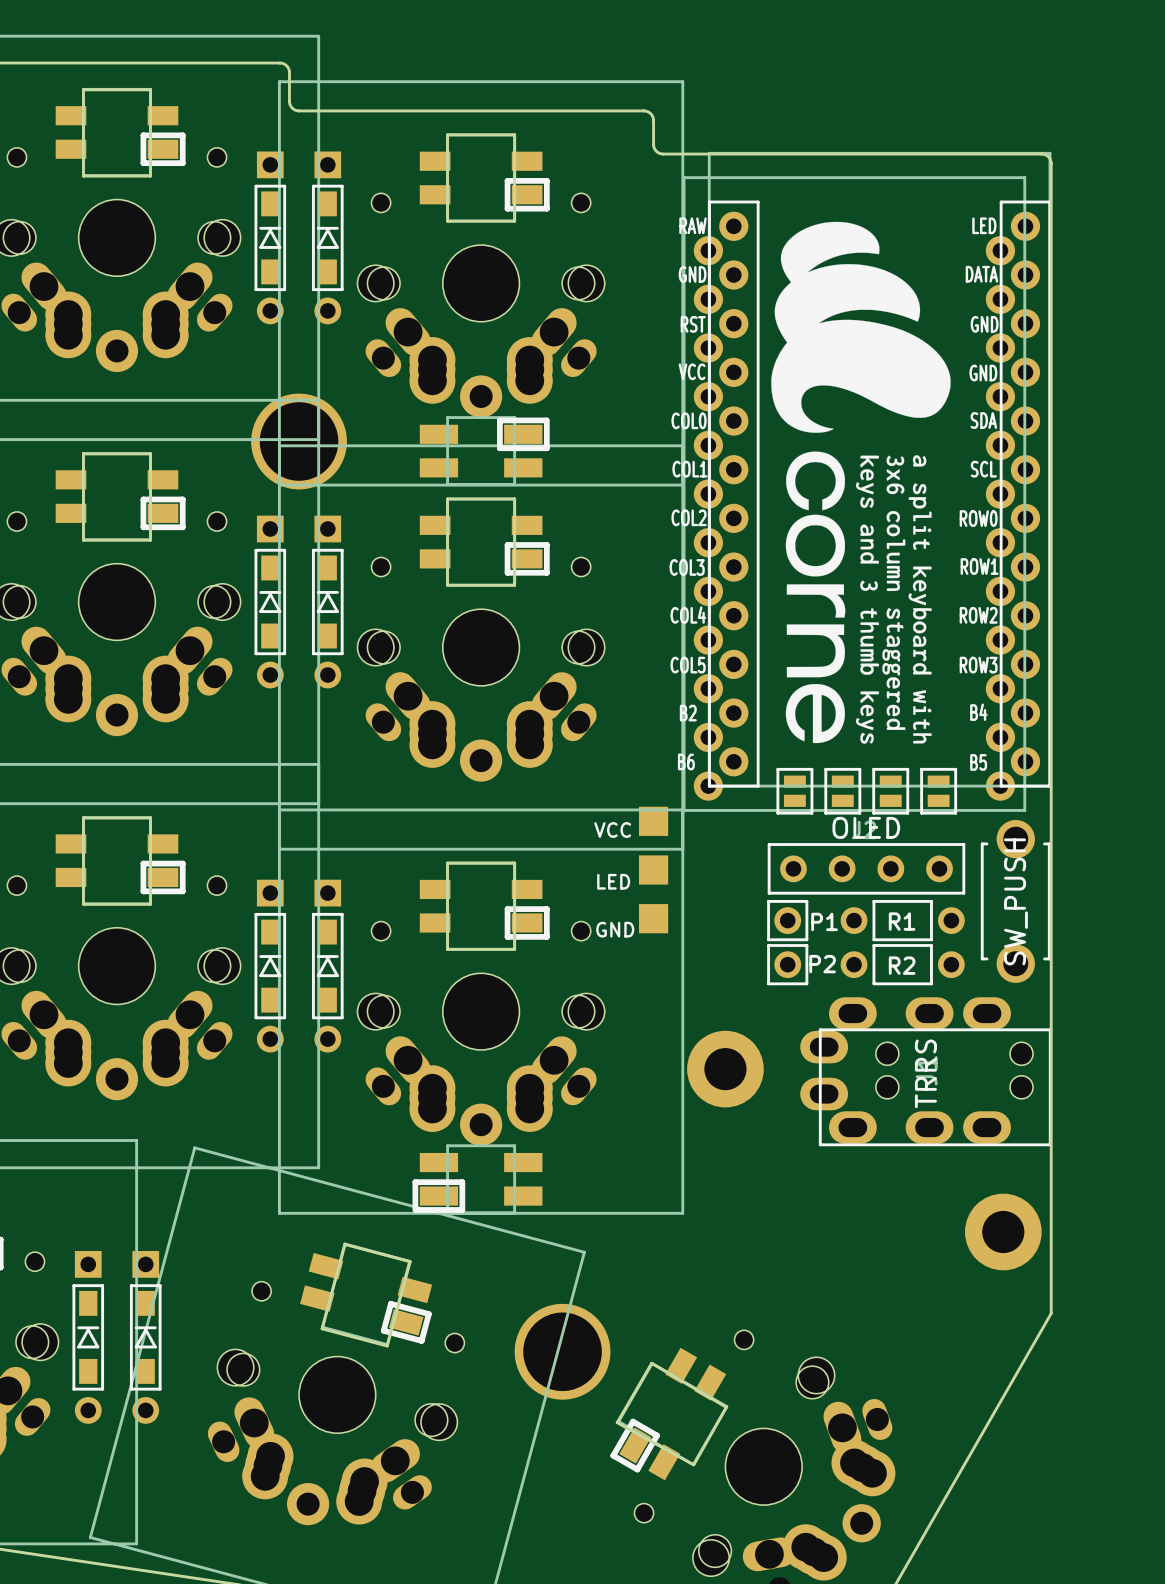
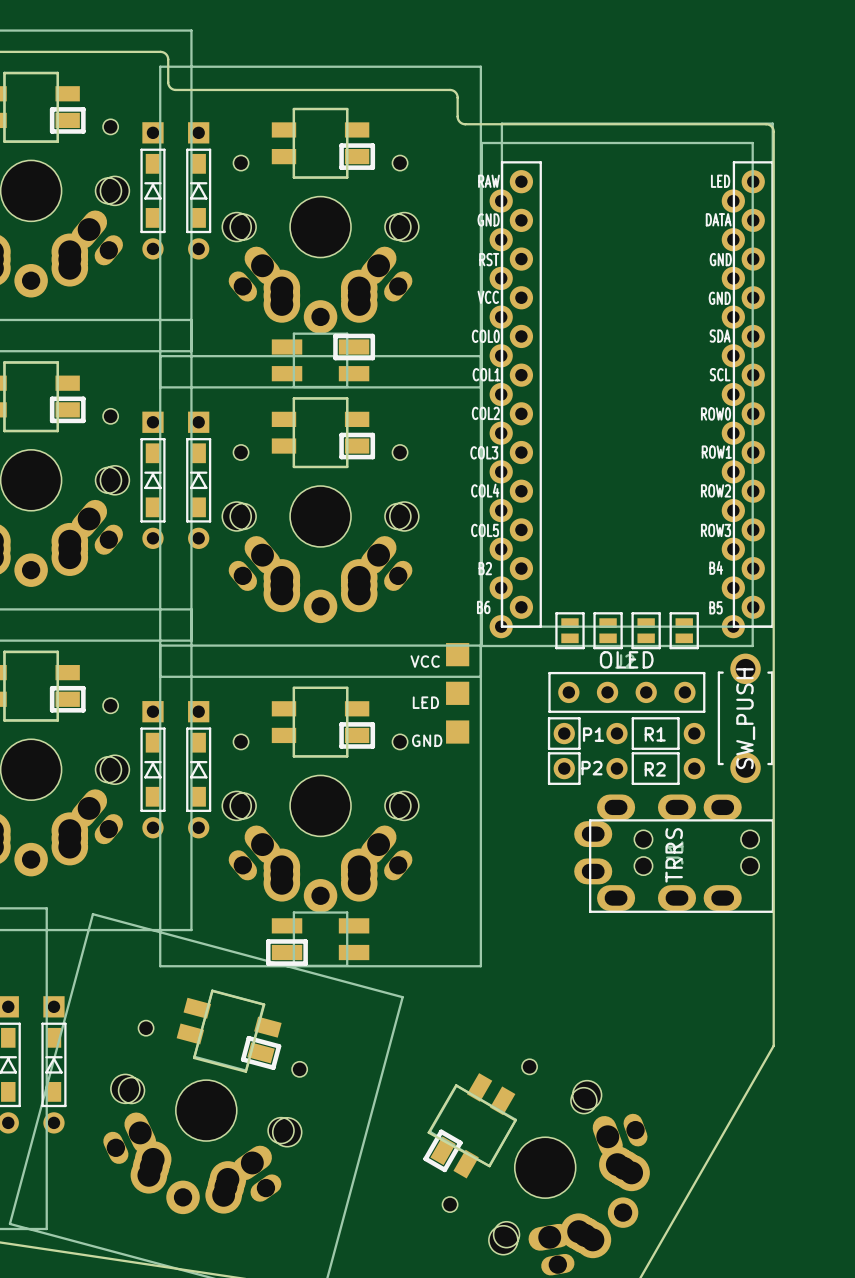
drawing: [771, 221, 951, 744] -> none
part: (299, 441) -> none
part: (725, 1069) -> none
part: (1003, 1232) -> none
part: (562, 1351) -> none

